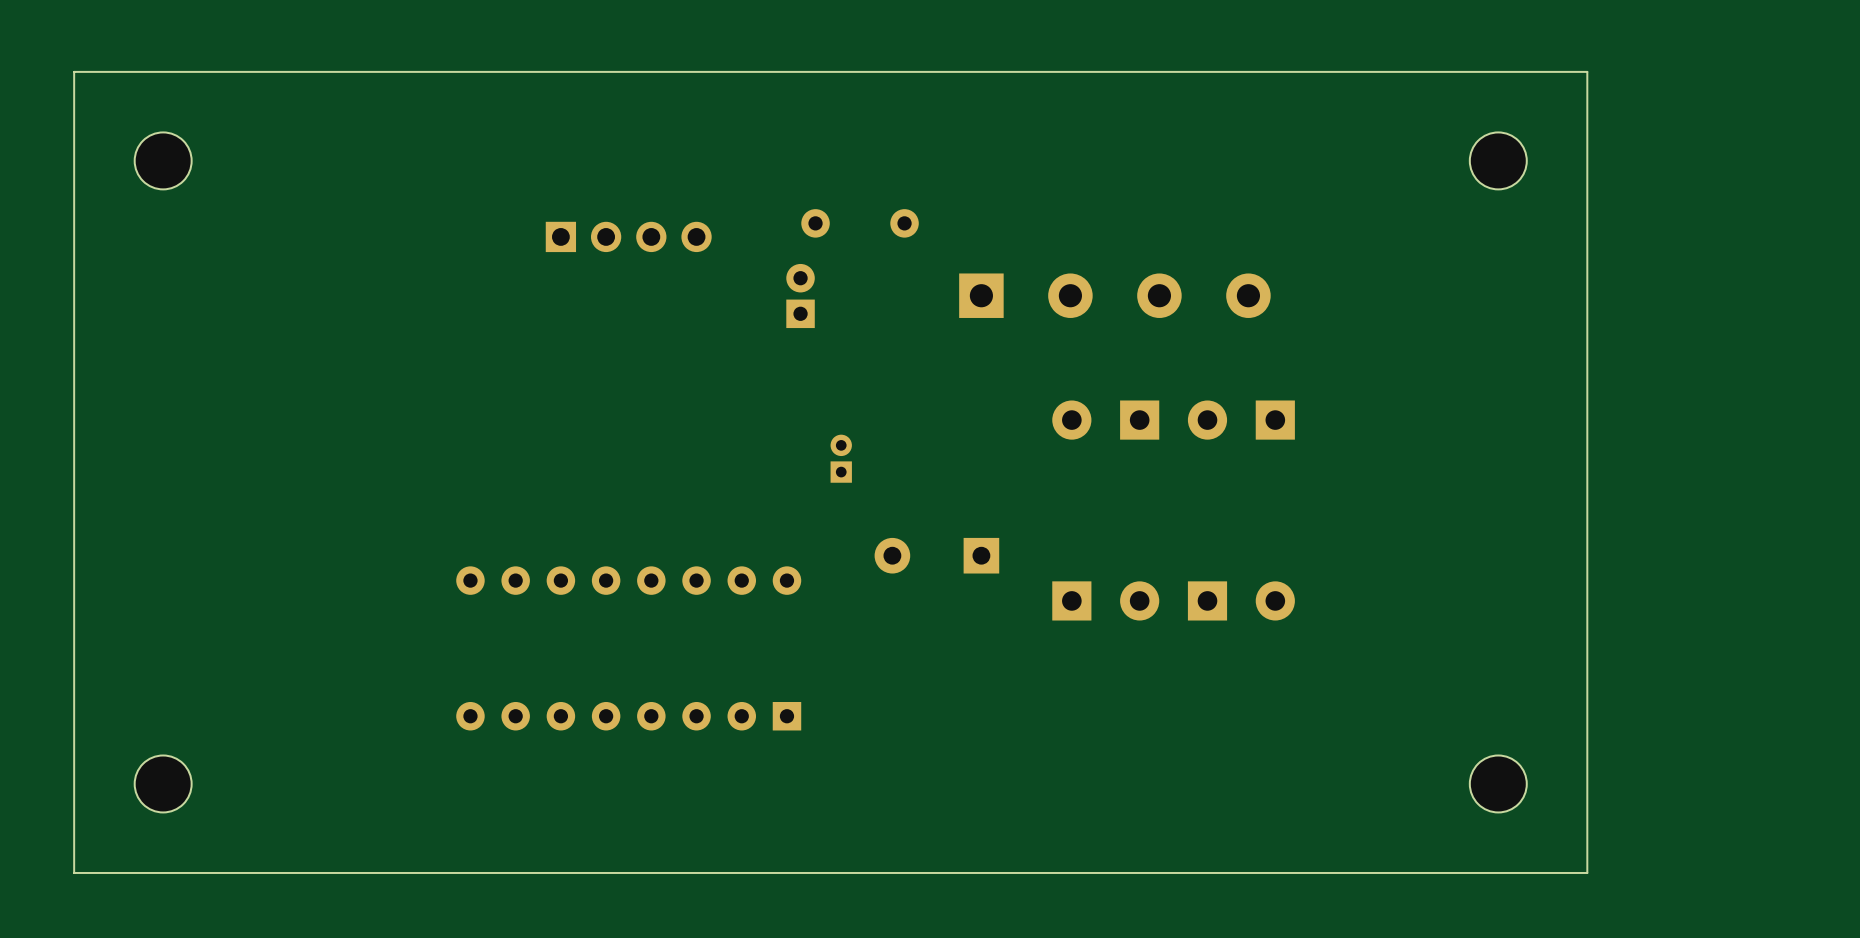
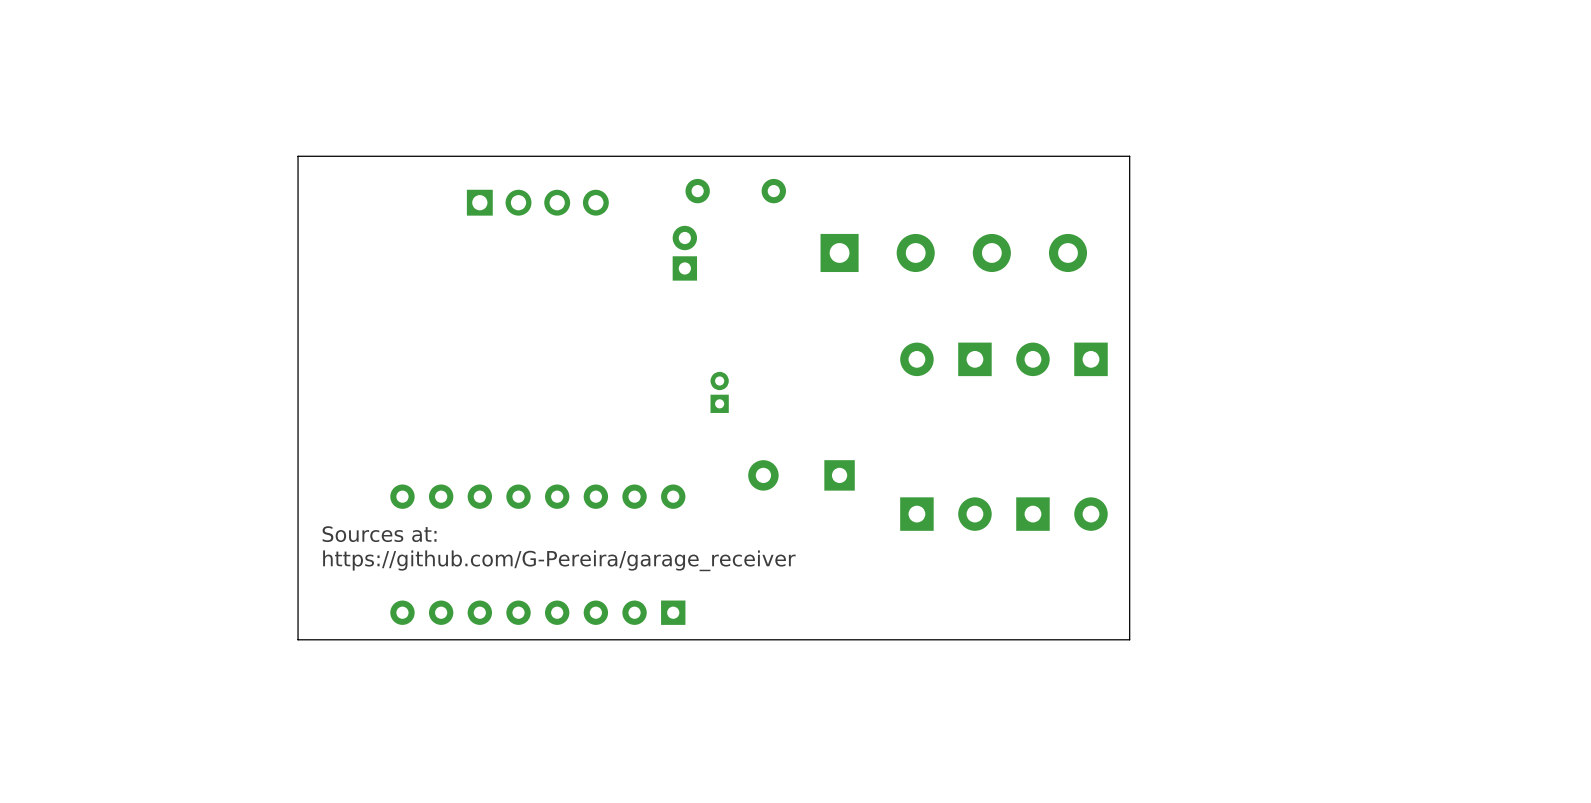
board edge: (1587, 71) (1587, 872) (74, 872) (74, 71) (1587, 71) -> none
part: (163, 160) -> none
part: (1498, 160) -> none
board edge: none -> (1129, 156) (1129, 639) (298, 639) (298, 156) (1129, 156)
text: none -> Sources at: (379, 534)
text: none -> https://github.com/G-Pereira/garage_receiver (559, 560)
part: (163, 783) -> none
part: (1498, 783) -> none

